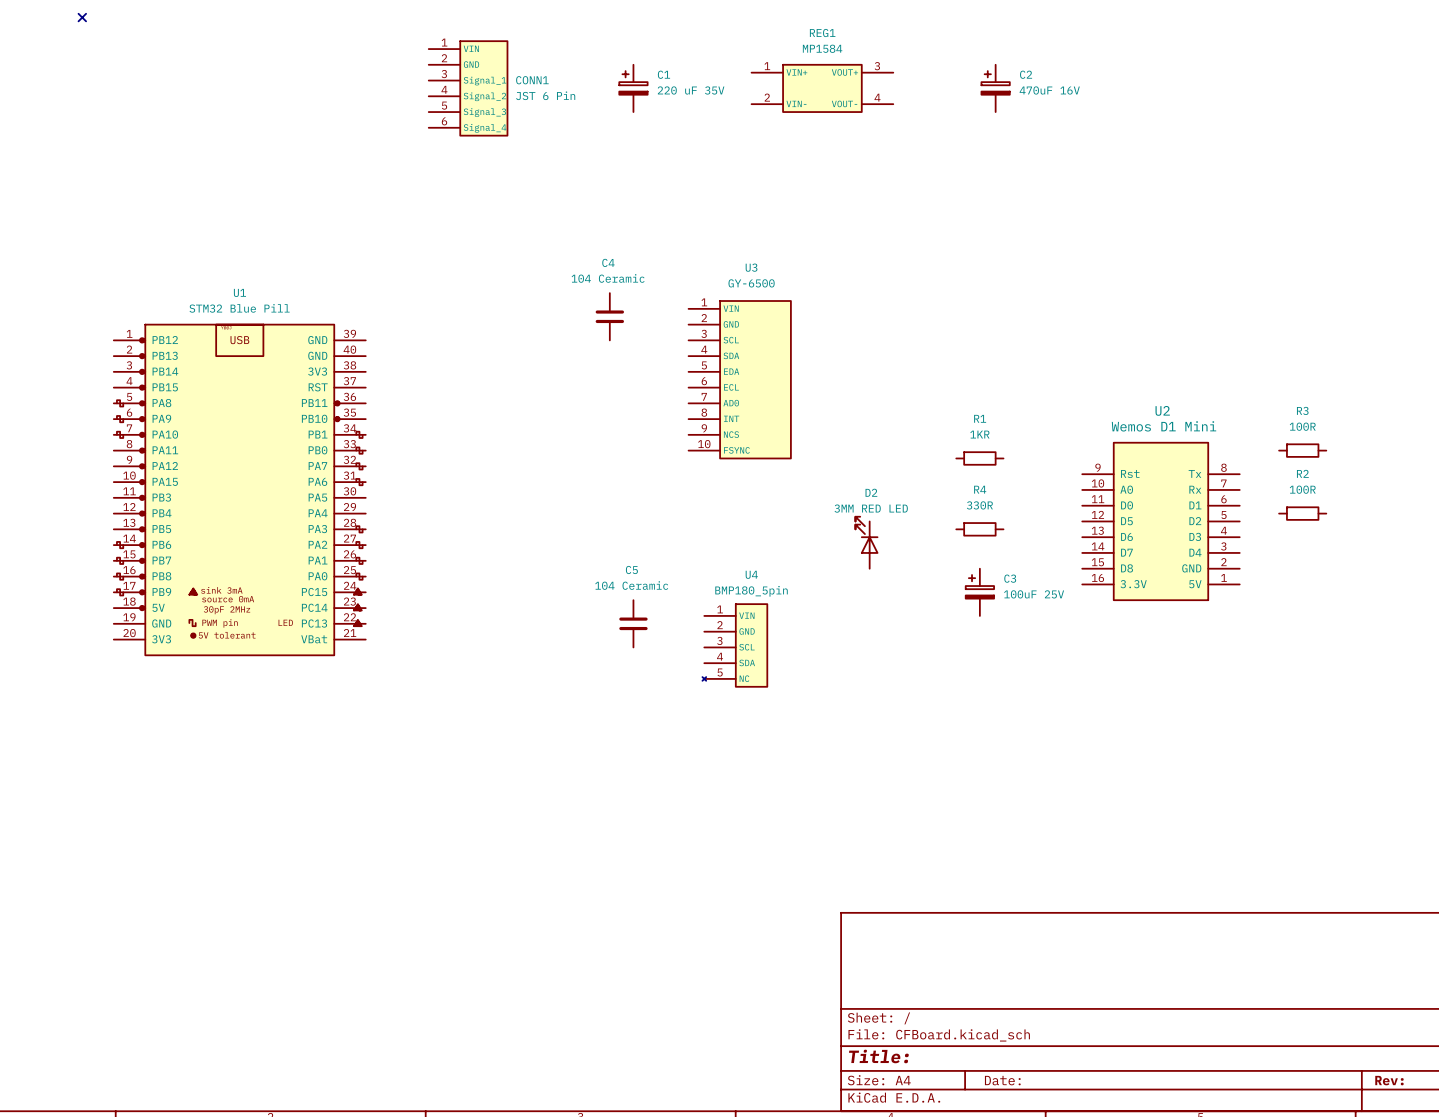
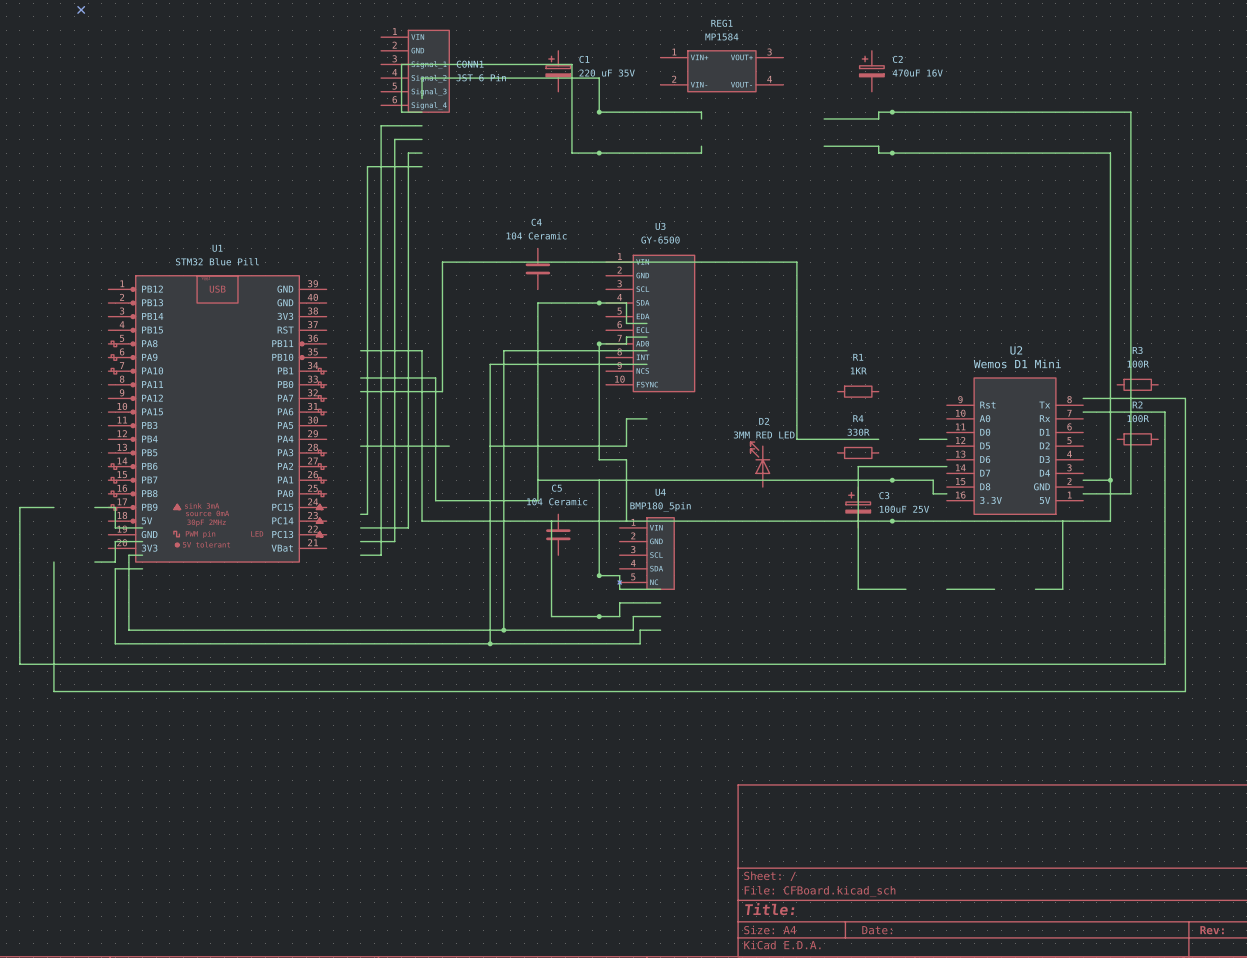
wire: none -> (422, 98) (422, 78) (599, 78) (599, 112) (701, 112) (701, 118)
wire: none -> (422, 112) (401, 112) (401, 64) (571, 64) (571, 153) (701, 153) (701, 146)
junction: none -> (599, 112)
junction: none -> (892, 112)
wire: none -> (824, 118) (878, 118) (878, 112) (1130, 112) (1130, 493) (1083, 493)
wire: none -> (422, 125) (381, 125) (381, 555) (360, 555)
wire: none -> (422, 139) (394, 139) (394, 541) (360, 541)
wire: none -> (824, 146) (878, 146) (878, 153) (1110, 153) (1110, 521) (422, 521) (422, 350) (360, 350)
wire: none -> (422, 153) (408, 153) (408, 527) (360, 527)
junction: none -> (599, 153)
junction: none -> (892, 153)
wire: none -> (422, 166) (367, 166) (367, 514) (360, 514)
junction: none -> (599, 303)
wire: none -> (646, 323) (626, 323) (626, 303) (537, 303) (537, 500) (435, 500) (435, 377) (360, 377)
wire: none -> (646, 337) (626, 337) (626, 343) (599, 343) (599, 459) (626, 459) (626, 521)
junction: none -> (599, 343)
wire: none -> (646, 350) (503, 350) (503, 630)
wire: none -> (646, 364) (490, 364) (490, 643)
wire: none -> (360, 391) (442, 391) (442, 262) (796, 262) (796, 439) (878, 439)
wire: none -> (1083, 398) (1185, 398) (1185, 691) (53, 691) (53, 562)
wire: none -> (1083, 412) (1164, 412) (1164, 664) (19, 664) (19, 507) (53, 507)
wire: none -> (646, 418) (626, 418) (626, 446) (490, 446)
wire: none -> (919, 439) (946, 439)
wire: none -> (360, 446) (449, 446)
wire: none -> (946, 466) (858, 466) (858, 589) (905, 589)
wire: none -> (537, 480) (933, 480) (933, 493) (946, 493)
wire: none -> (599, 480) (599, 575) (619, 575) (619, 589) (660, 589)
junction: none -> (892, 480)
wire: none -> (1083, 480) (1110, 480)
junction: none -> (1110, 480)
wire: none -> (94, 507) (115, 507) (115, 527) (142, 527)
wire: none -> (551, 521) (551, 616) (619, 616) (619, 602) (660, 602)
junction: none -> (892, 521)
wire: none -> (1062, 521) (1062, 589) (1035, 589)
wire: none -> (142, 541) (115, 541) (115, 562) (94, 562)
wire: none -> (142, 555) (128, 555) (128, 630) (633, 630) (633, 616) (660, 616)
wire: none -> (142, 568) (115, 568) (115, 643) (640, 643) (640, 630) (660, 630)
junction: none -> (599, 575)
wire: none -> (946, 589) (994, 589)
junction: none -> (599, 616)
junction: none -> (503, 630)
junction: none -> (490, 643)

